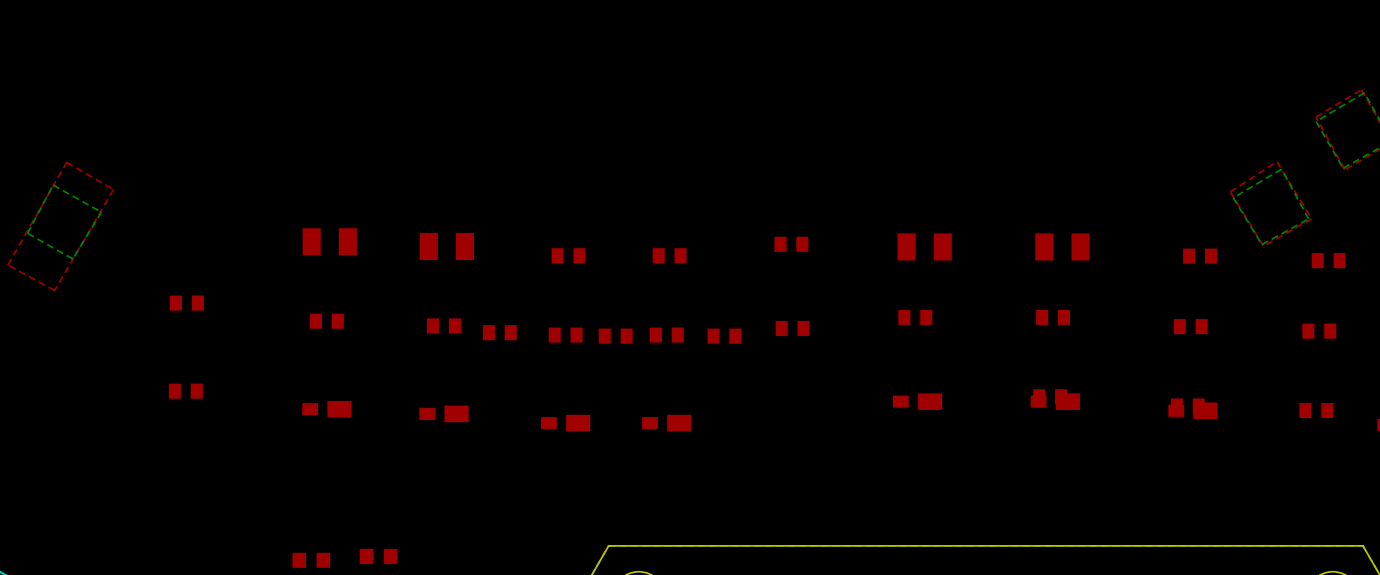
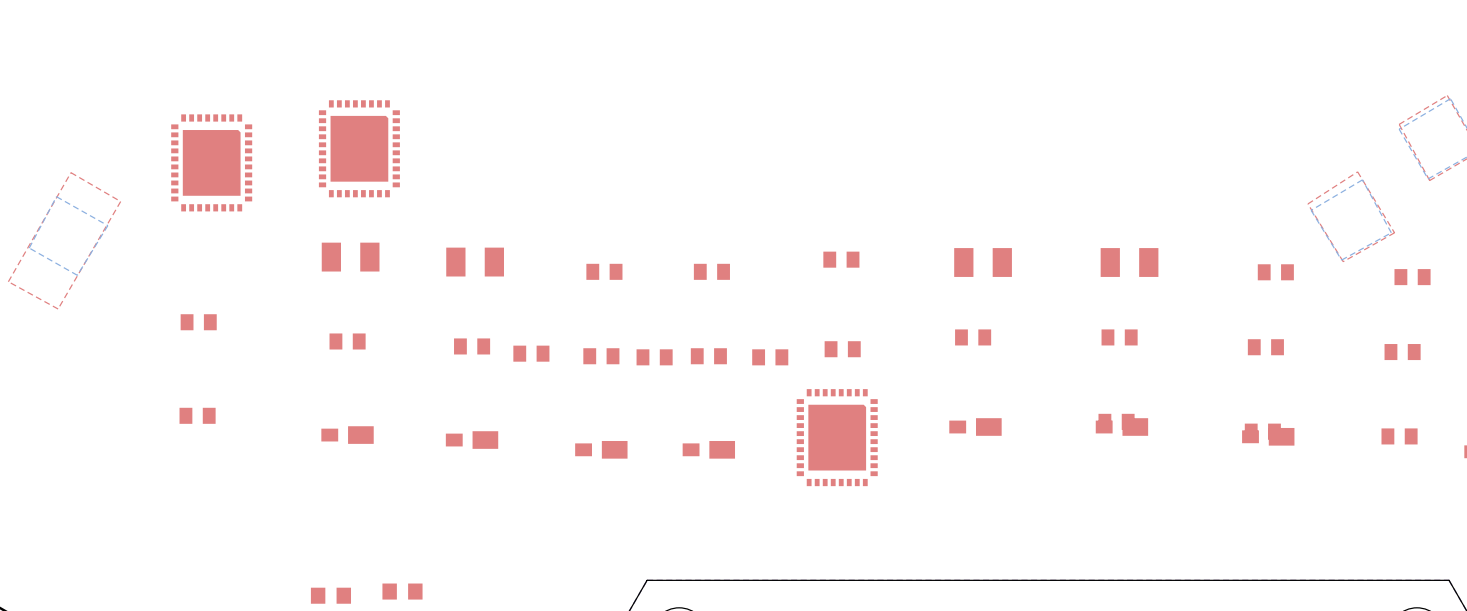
part: none -> (359, 148)
part: none -> (211, 162)
part: none -> (837, 437)

